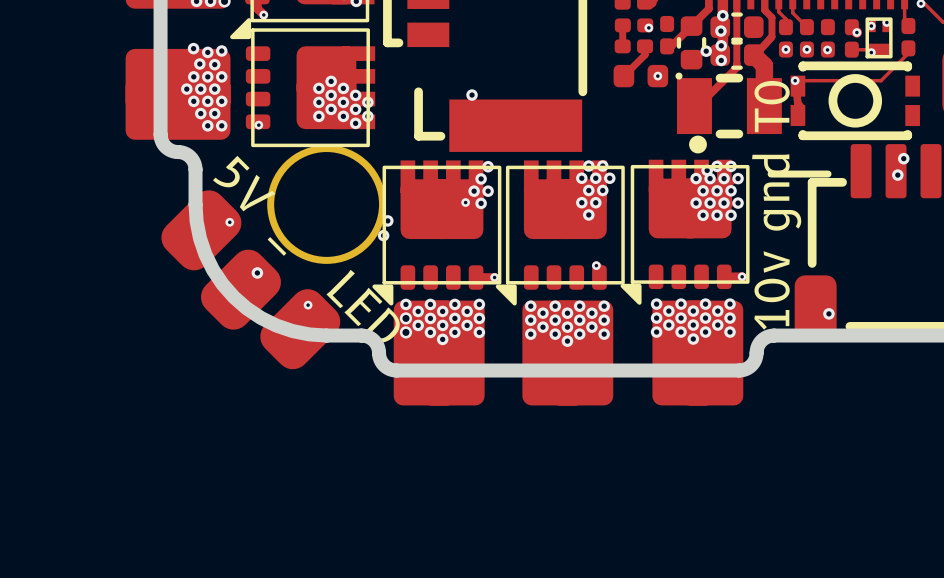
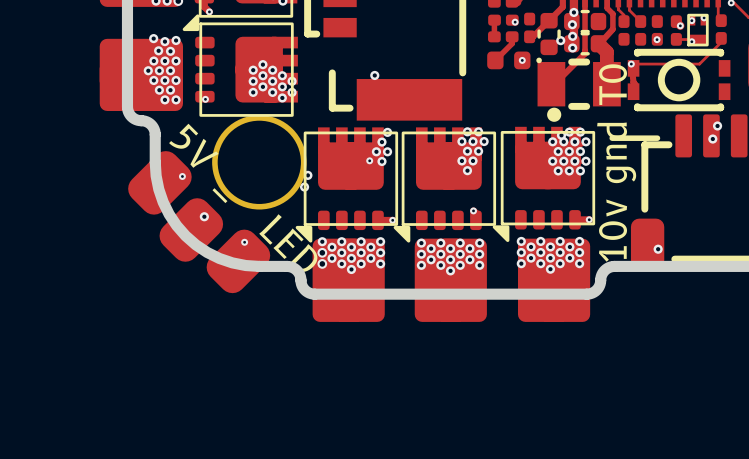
via: (785, 49) -> none
via: (806, 49) -> none

